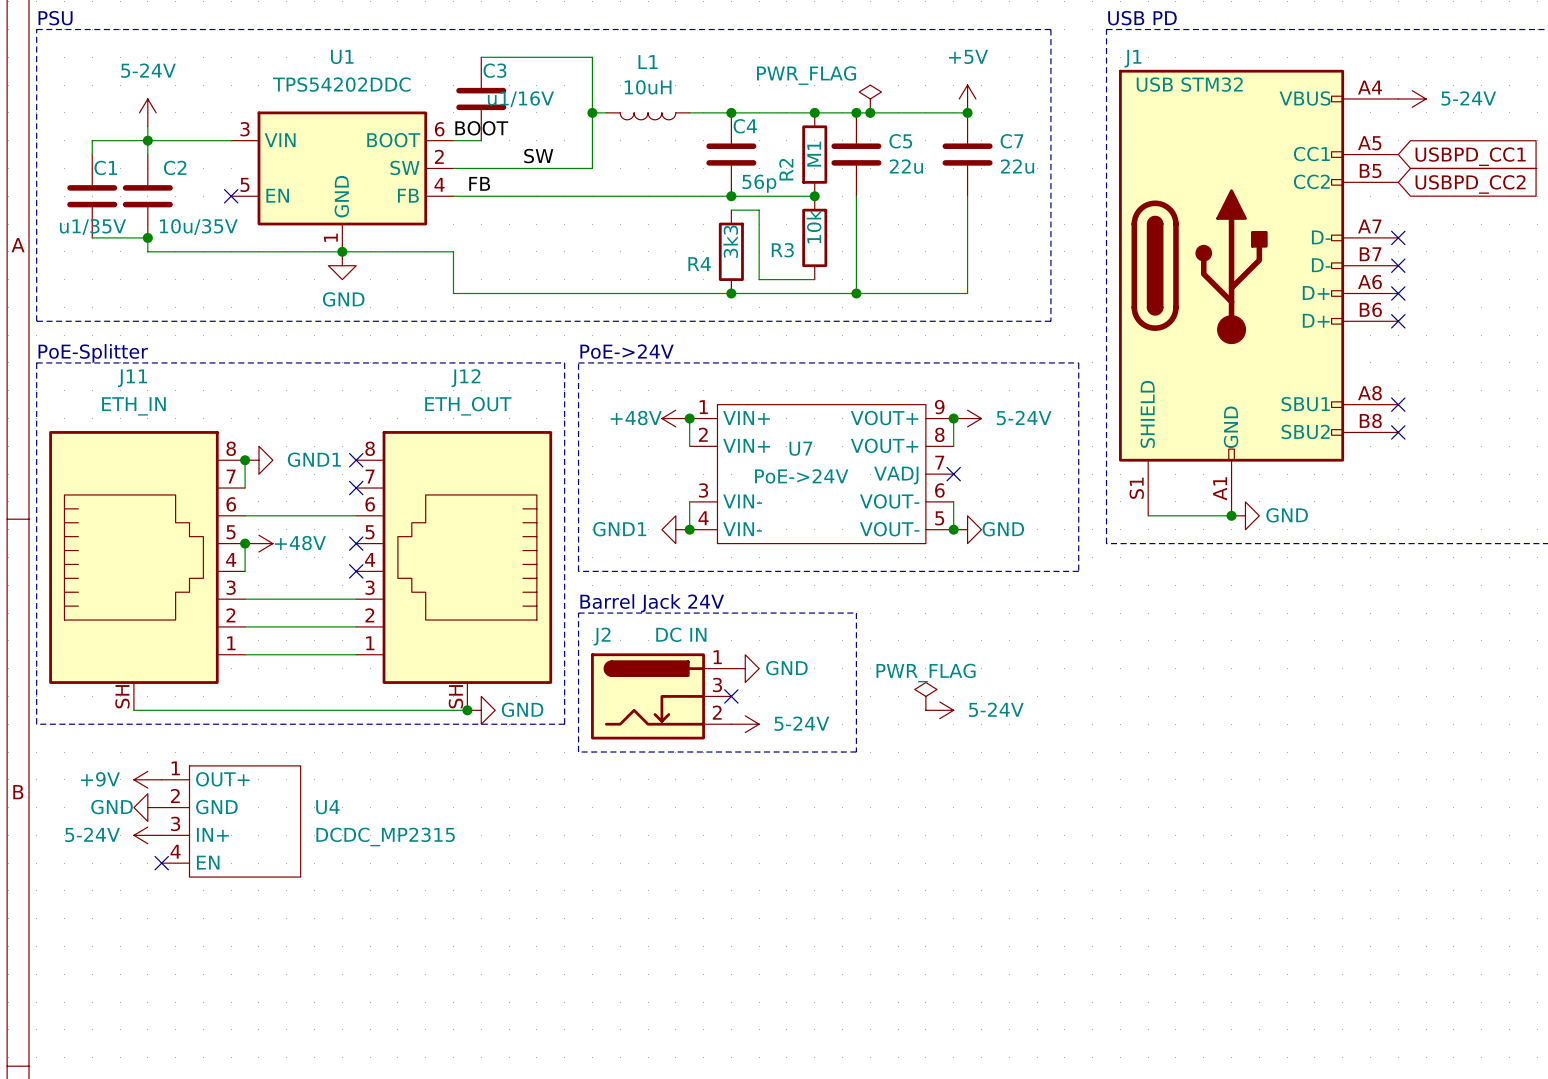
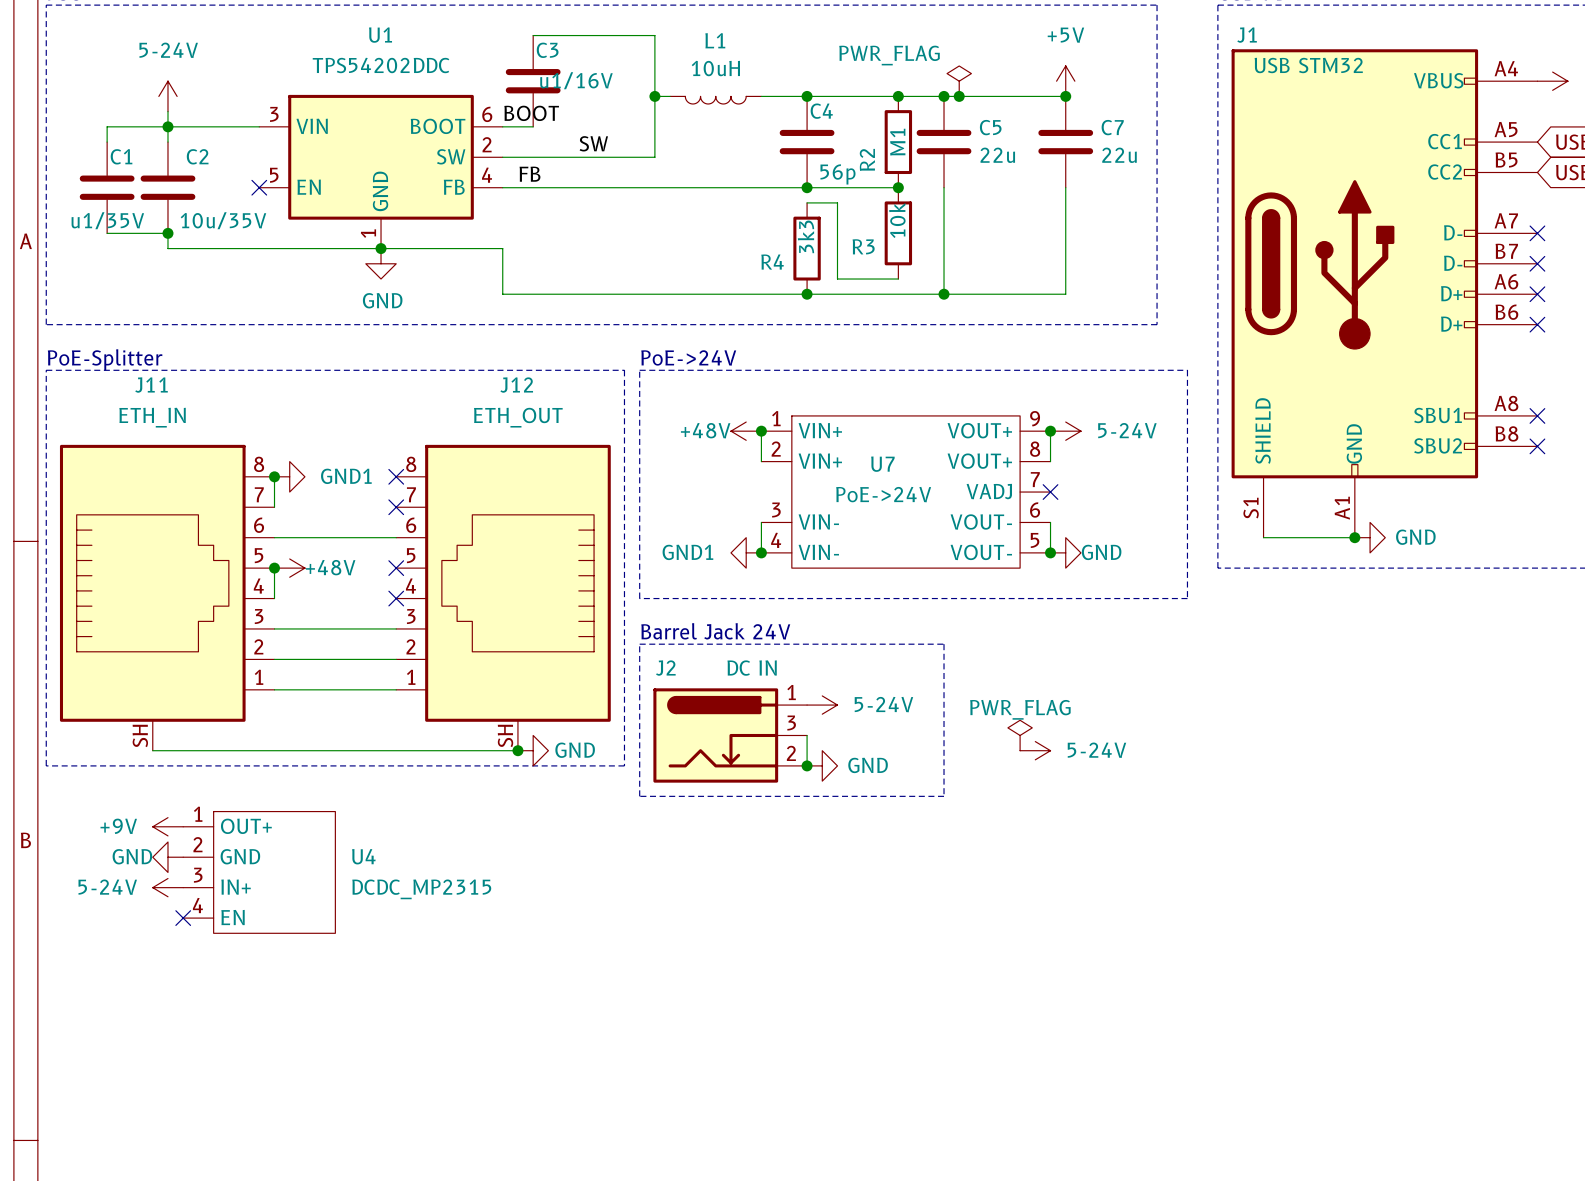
power symbol: GND (745, 668) -> 5-24V (822, 705)
wire: none -> (807, 735) (807, 765)
no-connect mark: (731, 696) -> none
junction: none -> (807, 765)
power symbol: 5-24V (745, 724) -> GND (822, 765)

